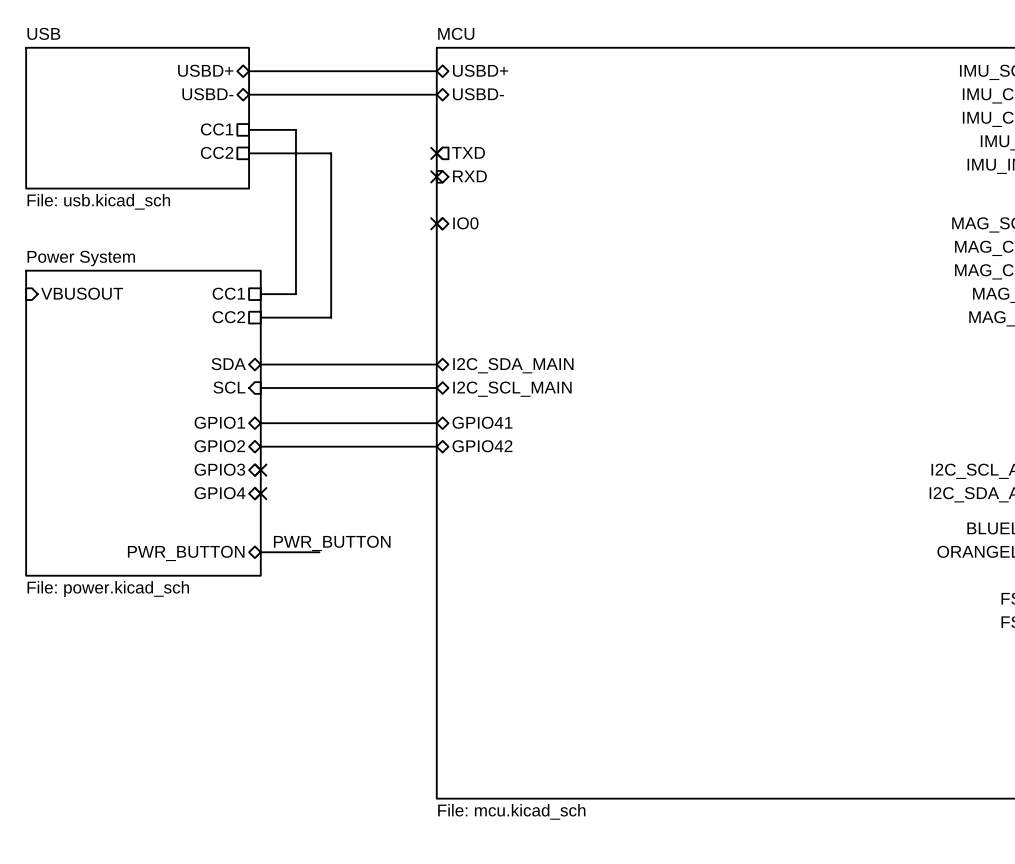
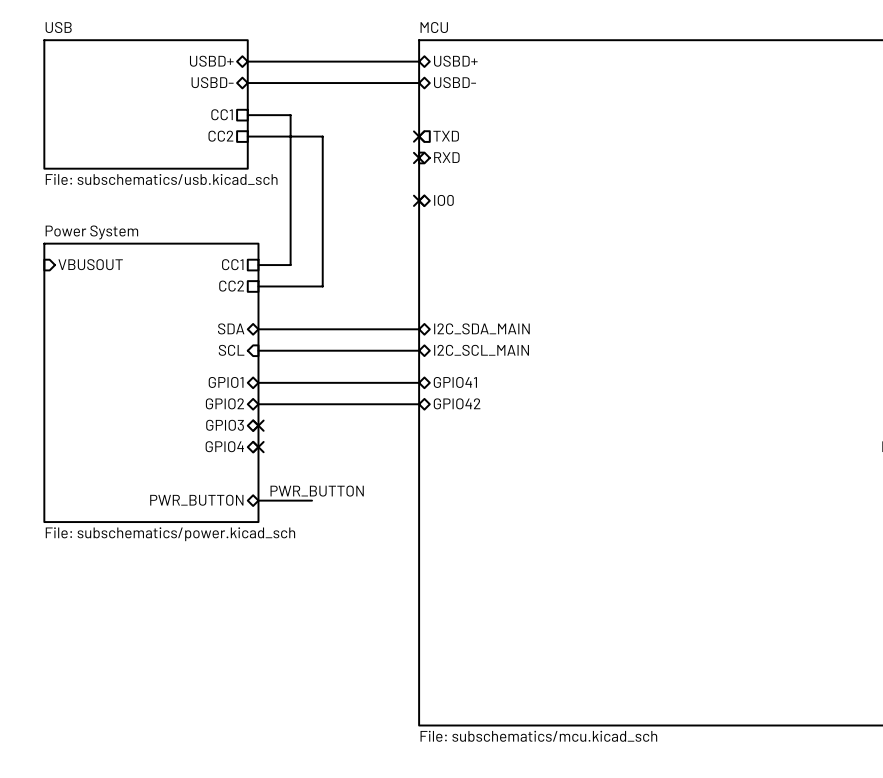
sheet USB value: File: usb.kicad_sch (98, 201) -> File: subschematics/usb.kicad_sch (161, 179)
sheet Power System value: File: power.kicad_sch (108, 589) -> File: subschematics/power.kicad_sch (170, 534)
sheet MCU value: File: mcu.kicad_sch (511, 811) -> File: subschematics/mcu.kicad_sch (538, 736)

